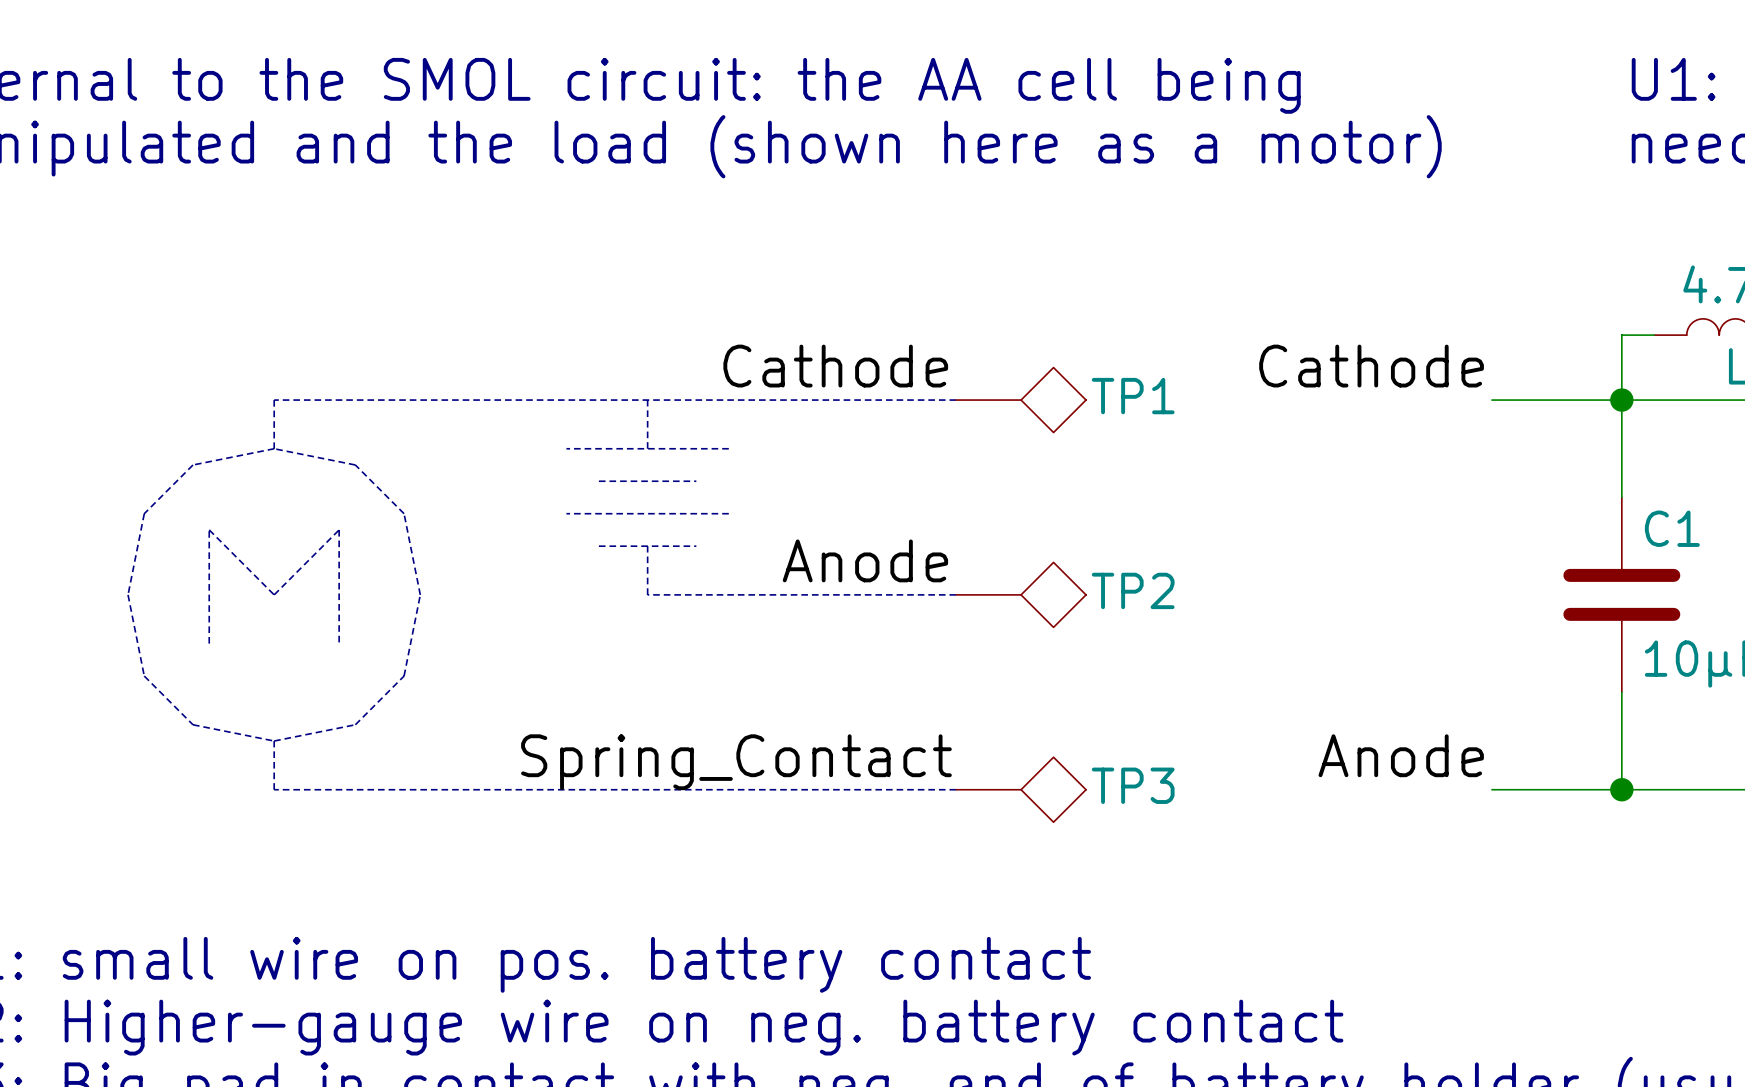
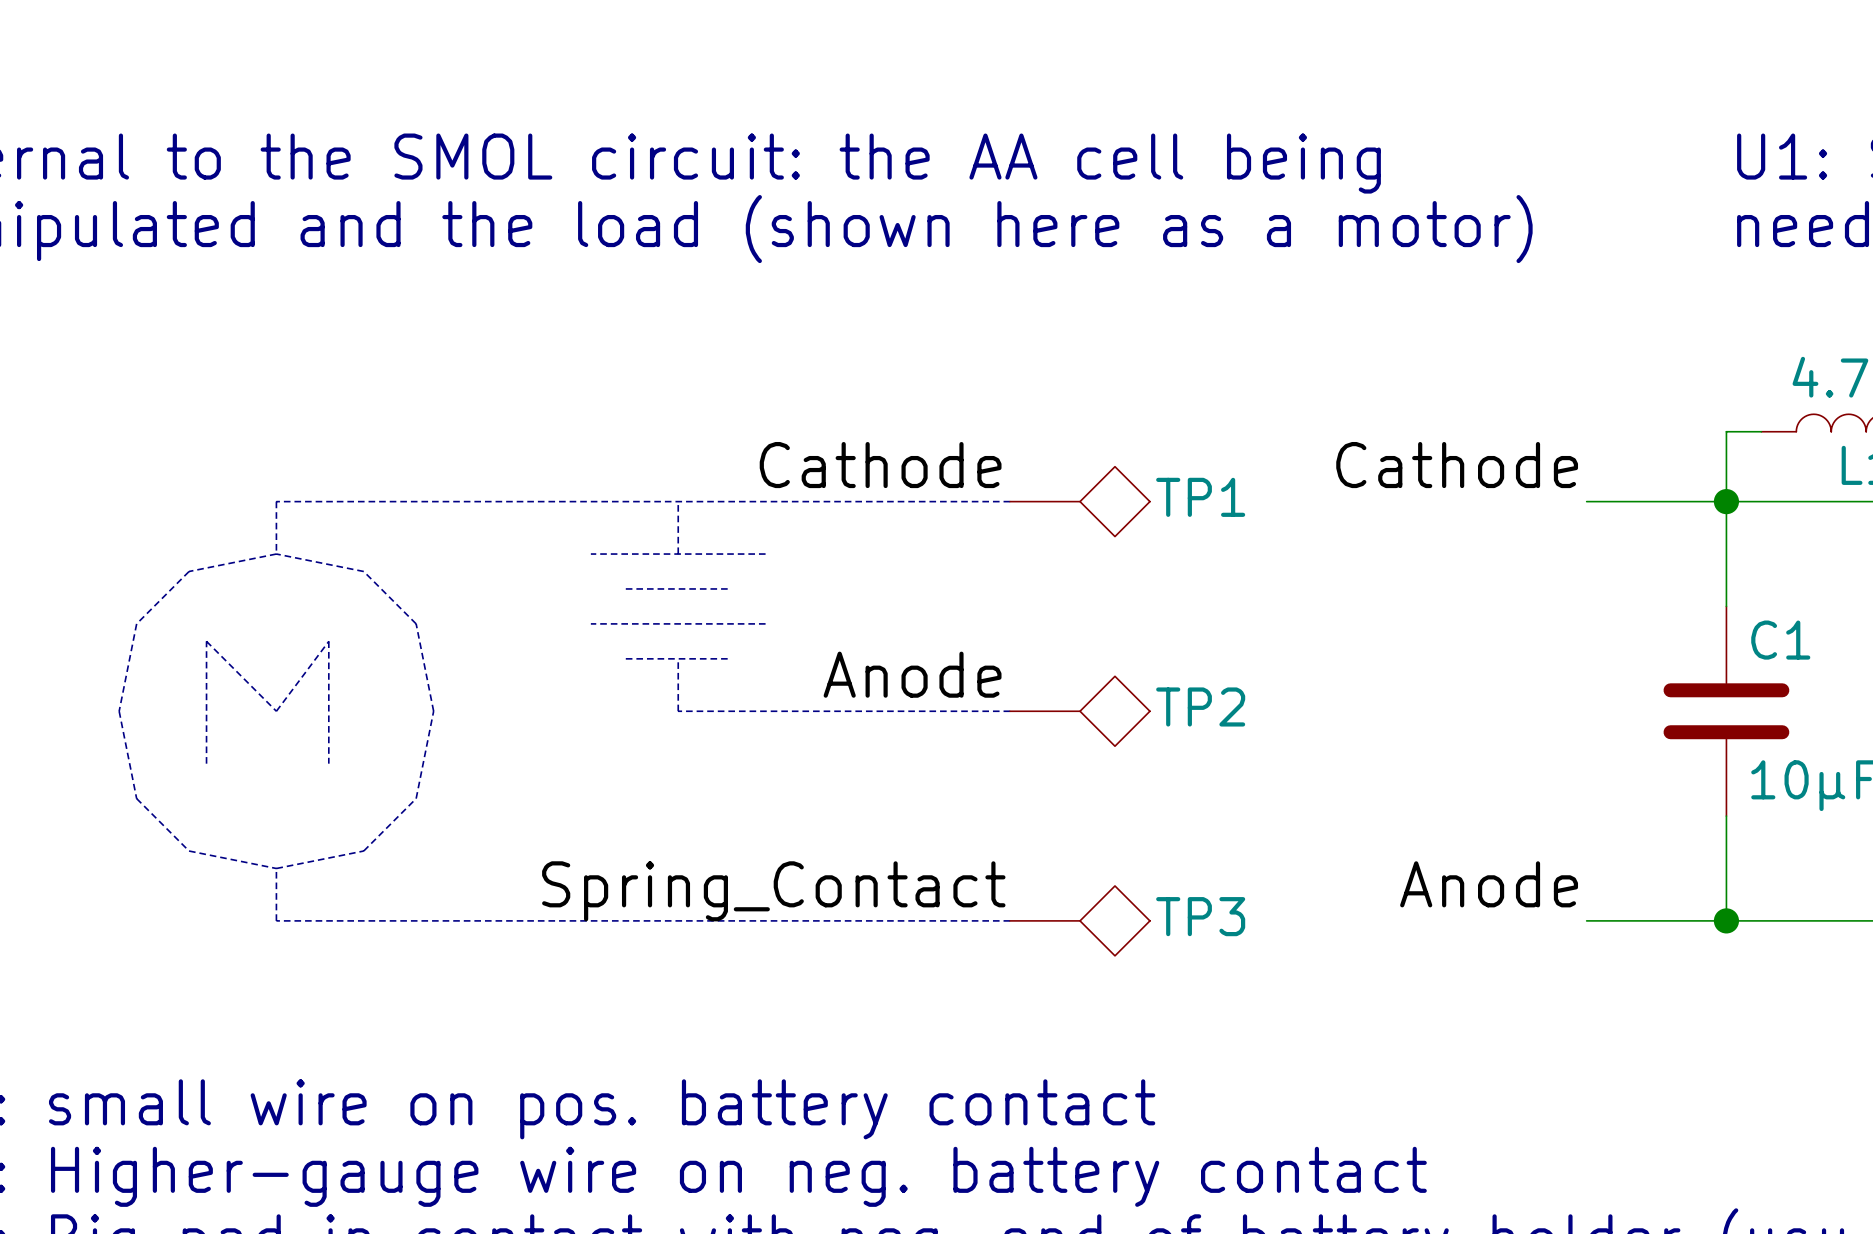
line: (274, 594) (339, 529) (339, 643) -> (276, 711) (328, 641) (328, 763)

